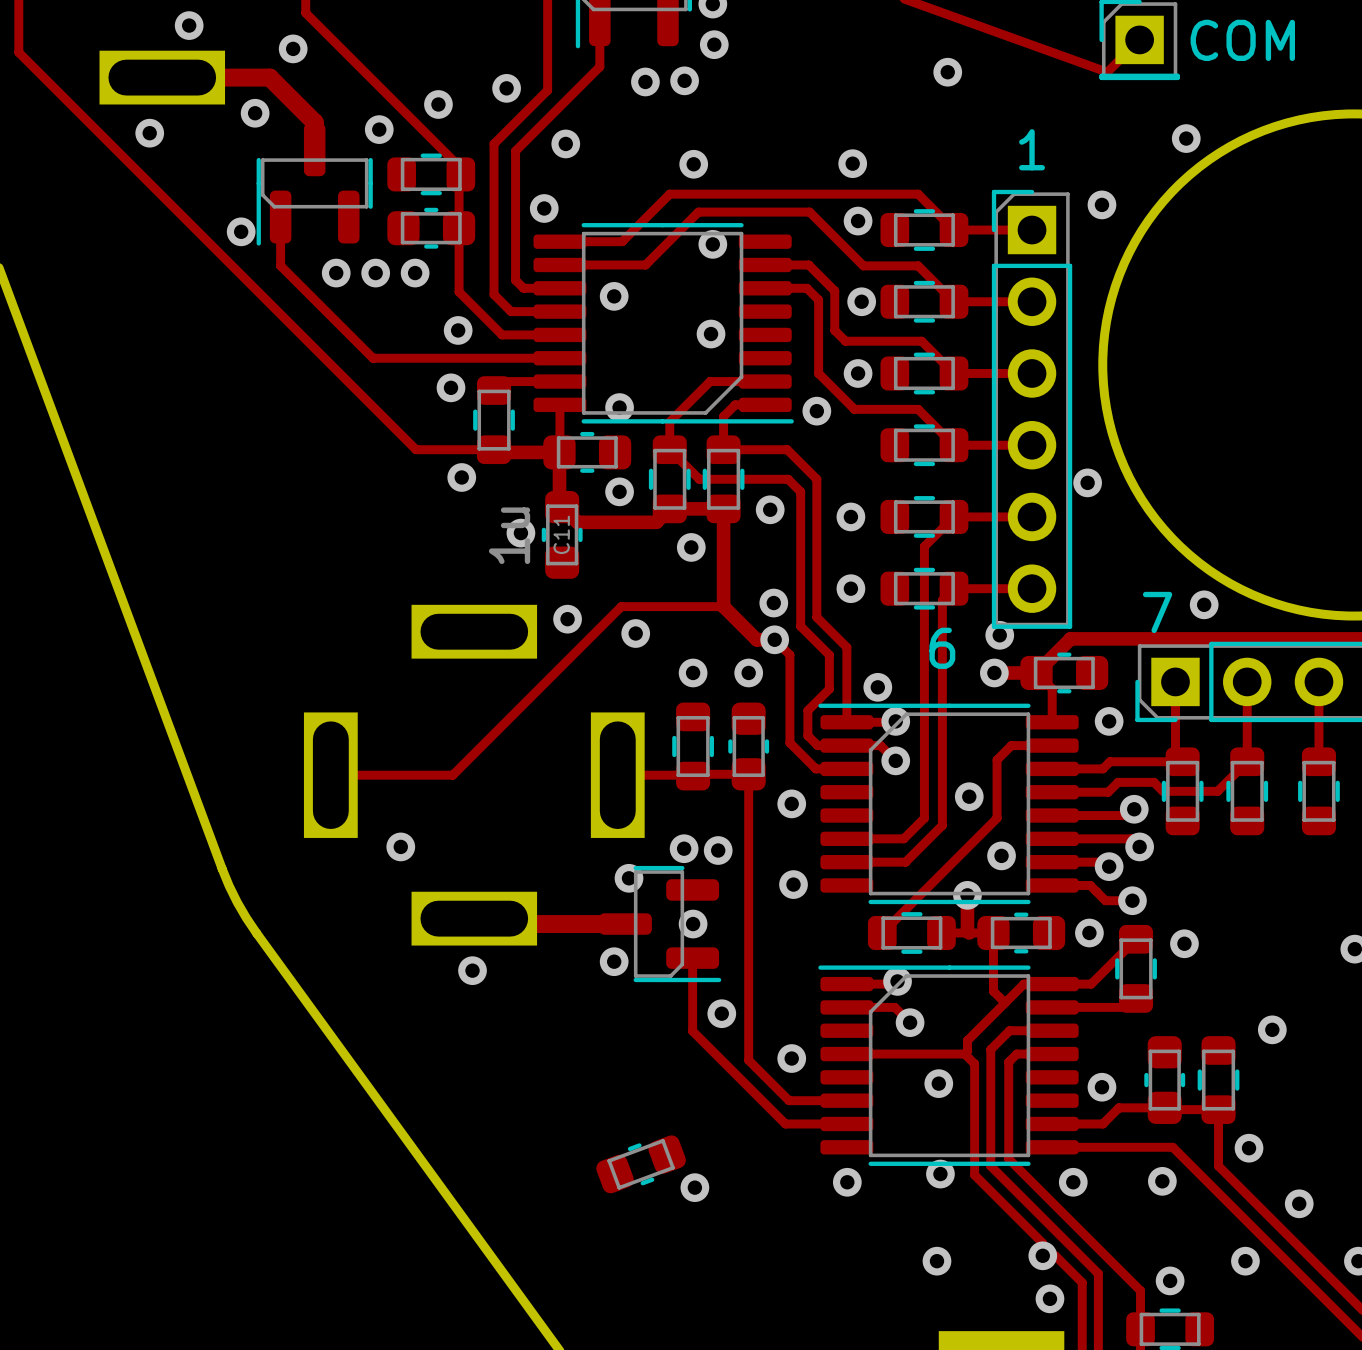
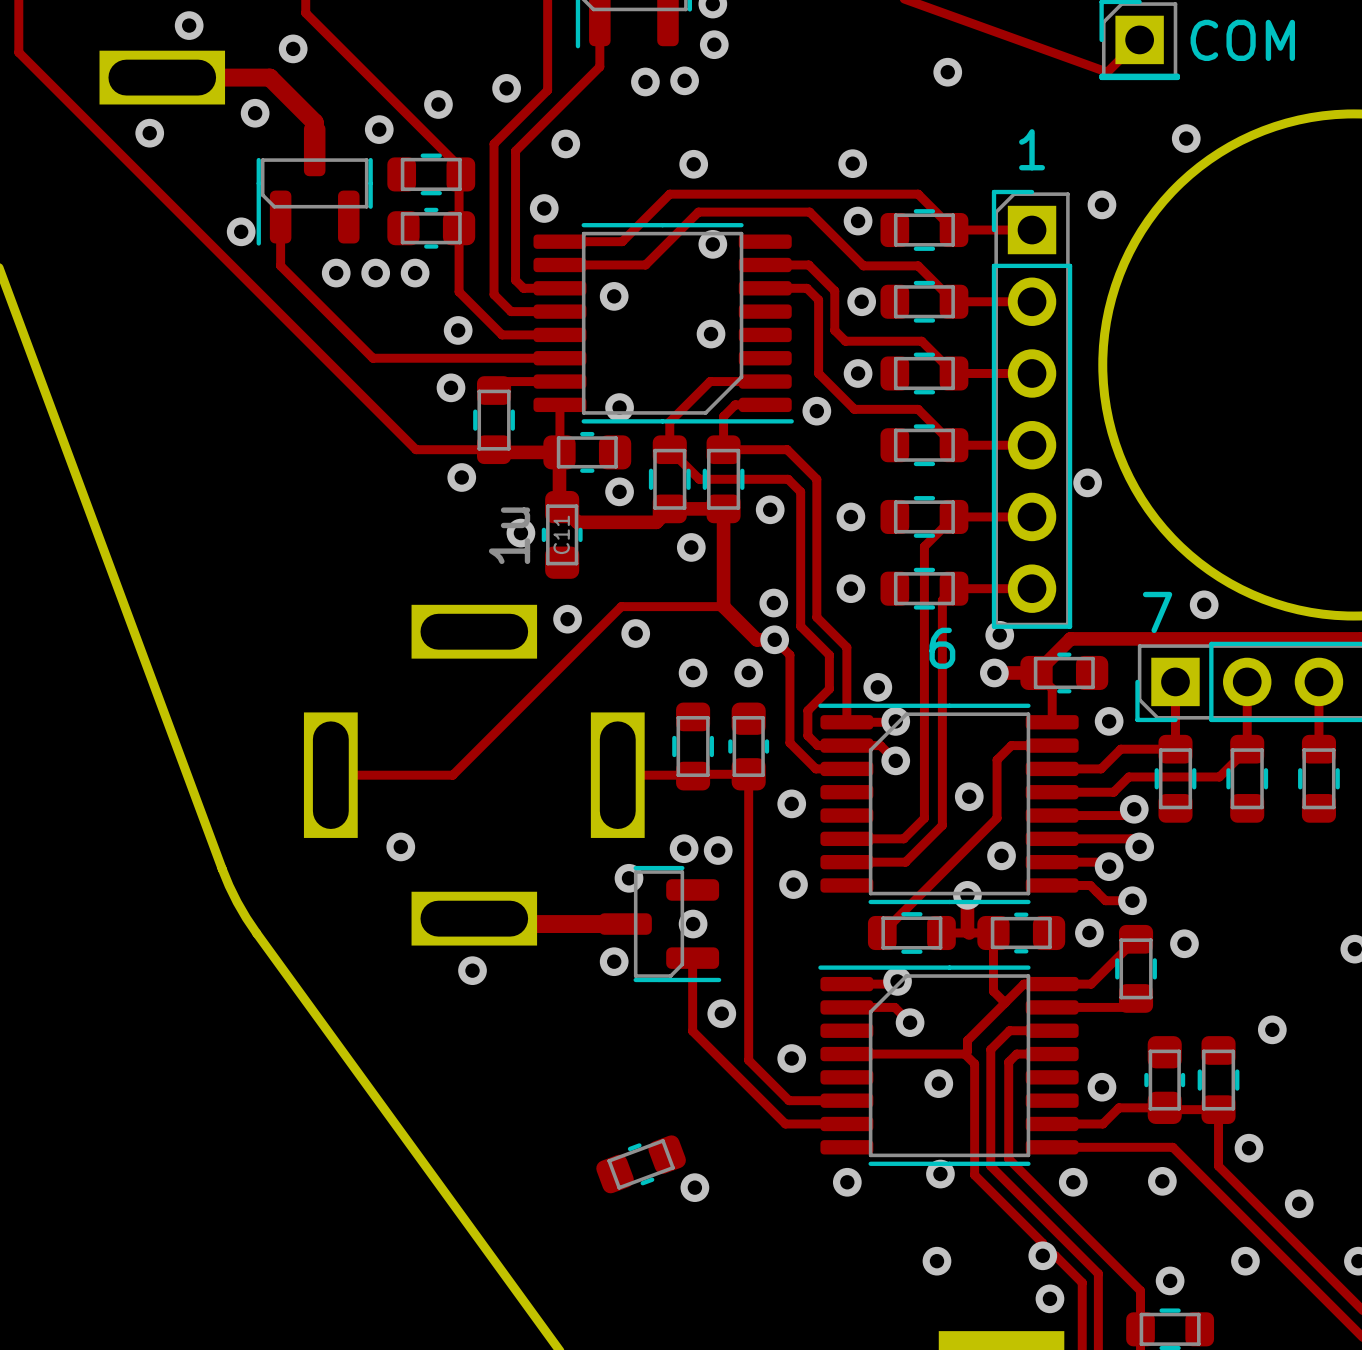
track: (1175, 749) (1175, 754) (1182, 761) (1110, 761) (1101, 768) -> (1175, 749) (1120, 749) (1101, 768)
track: (1247, 749) (1247, 761) (1217, 791) (1162, 791) (1153, 782) (1118, 782) (1108, 792) -> (1247, 749) (1219, 776) (1128, 776) (1113, 792) (1108, 792)
part position: (1182, 791) -> (1175, 778)
part position: (1247, 791) -> (1247, 778)
part position: (1318, 791) -> (1318, 778)

